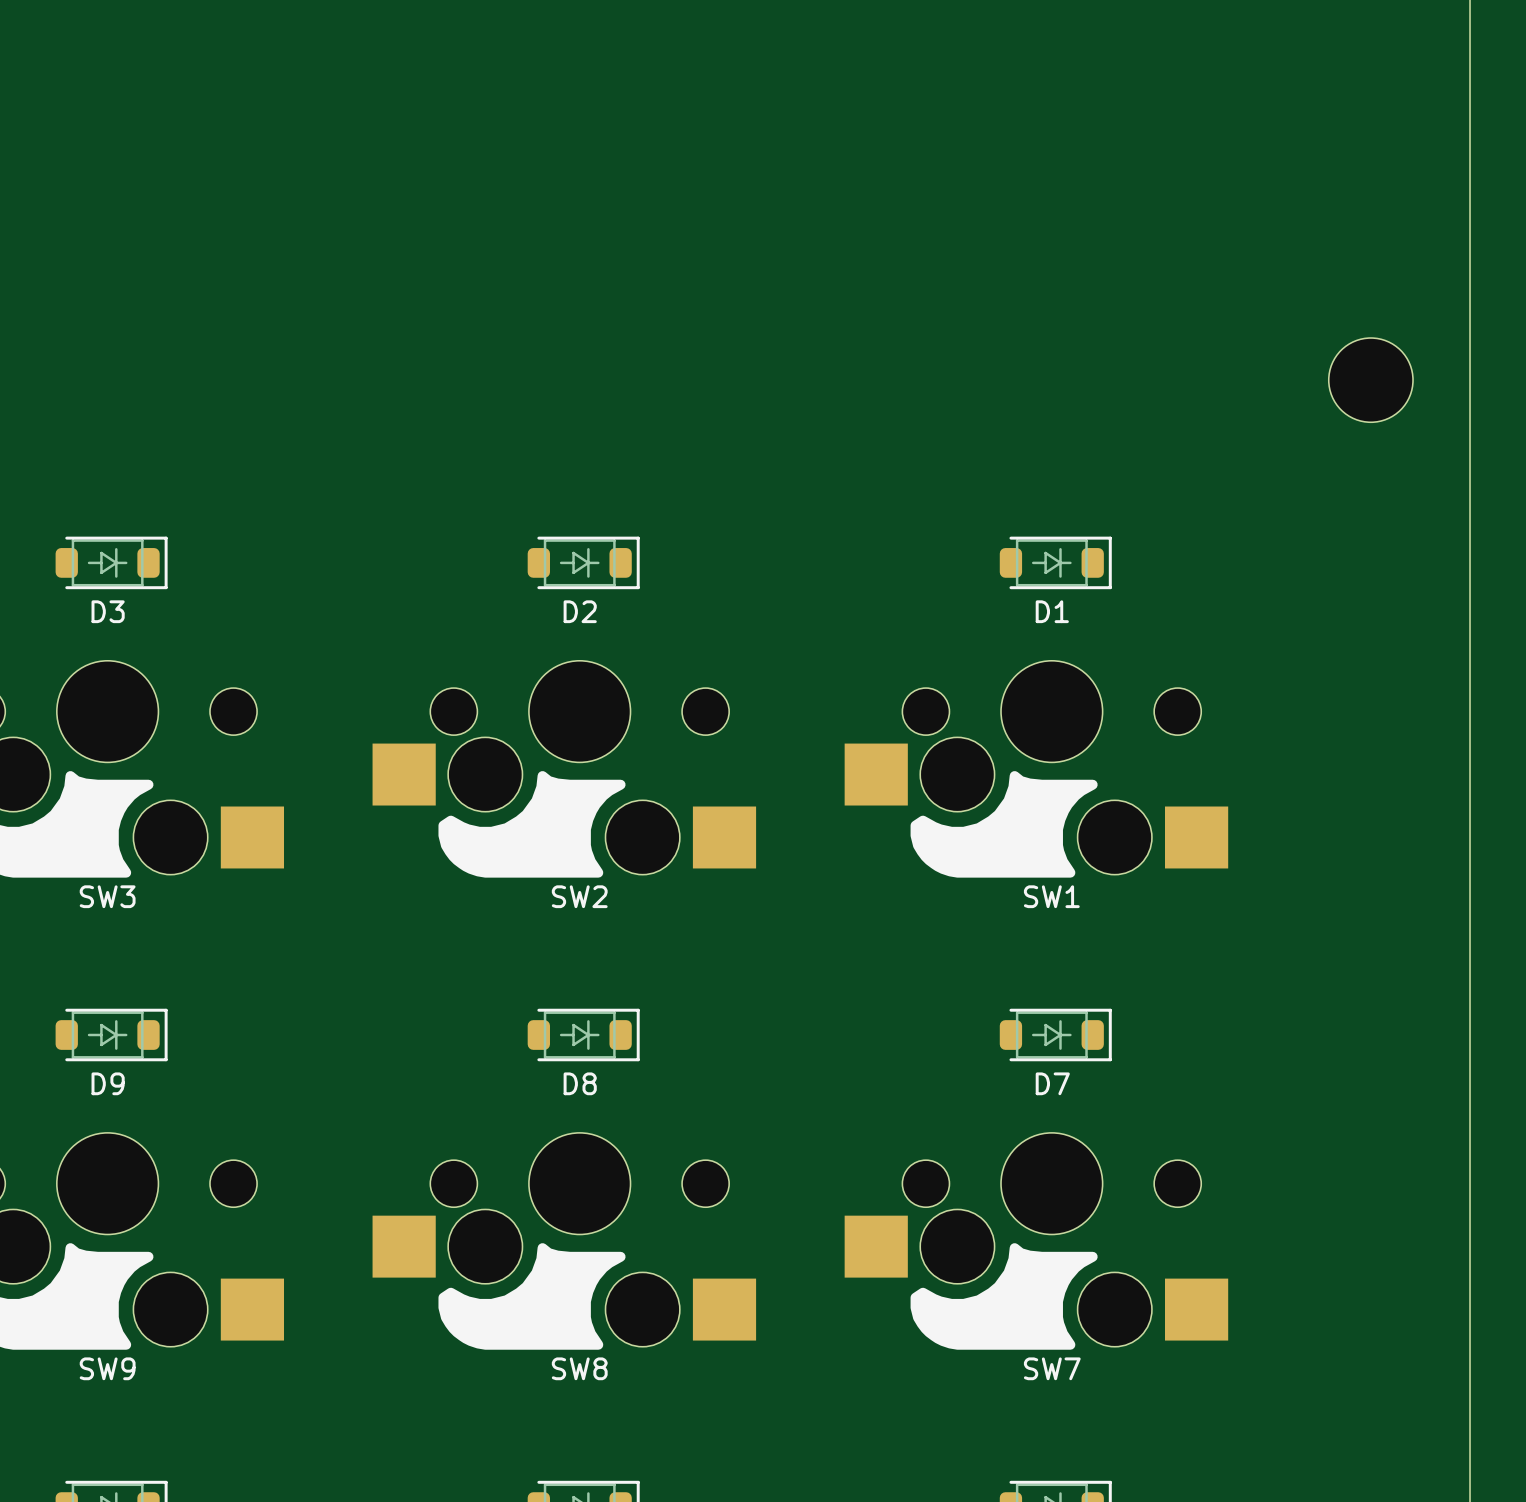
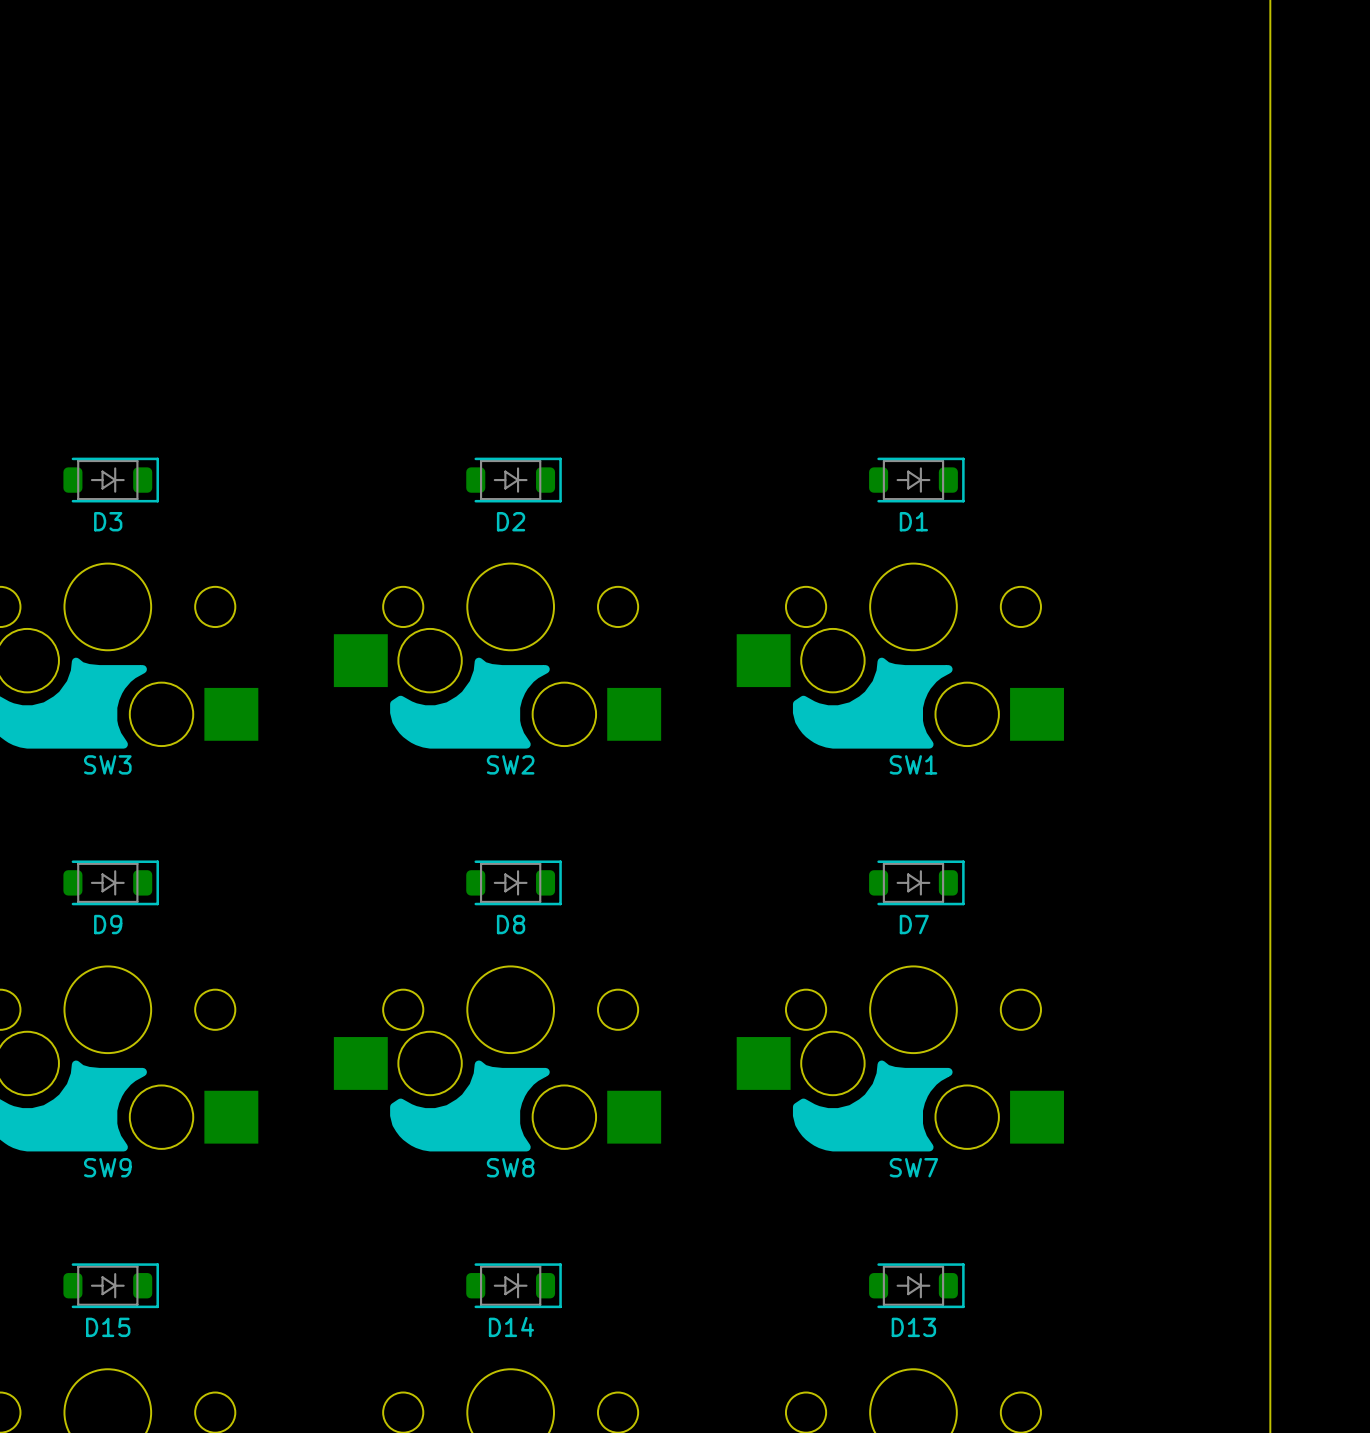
part: (1370, 380) -> none

